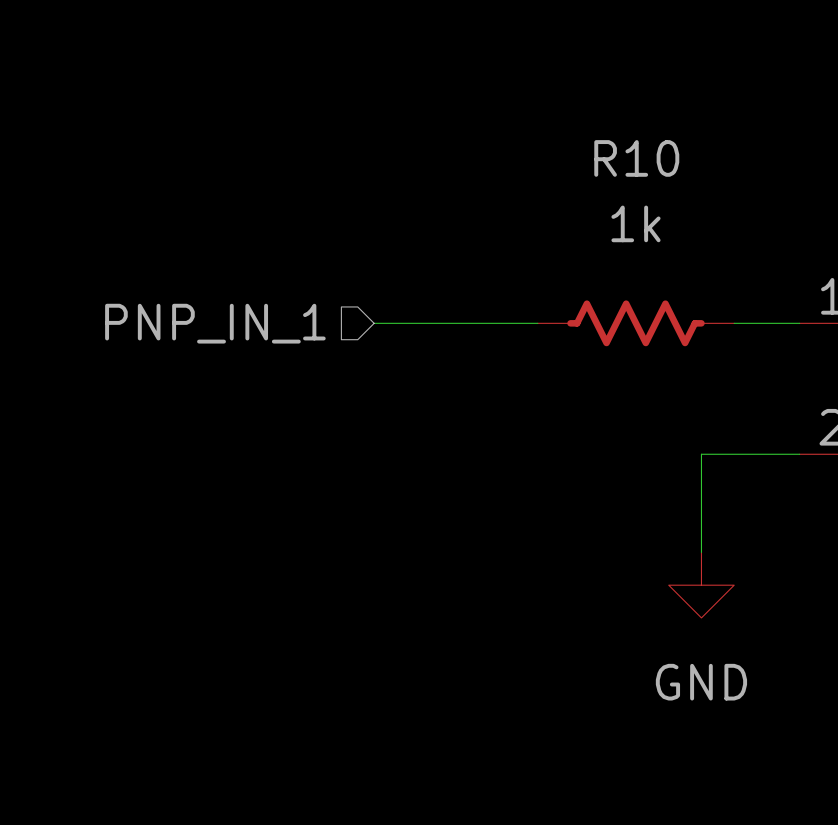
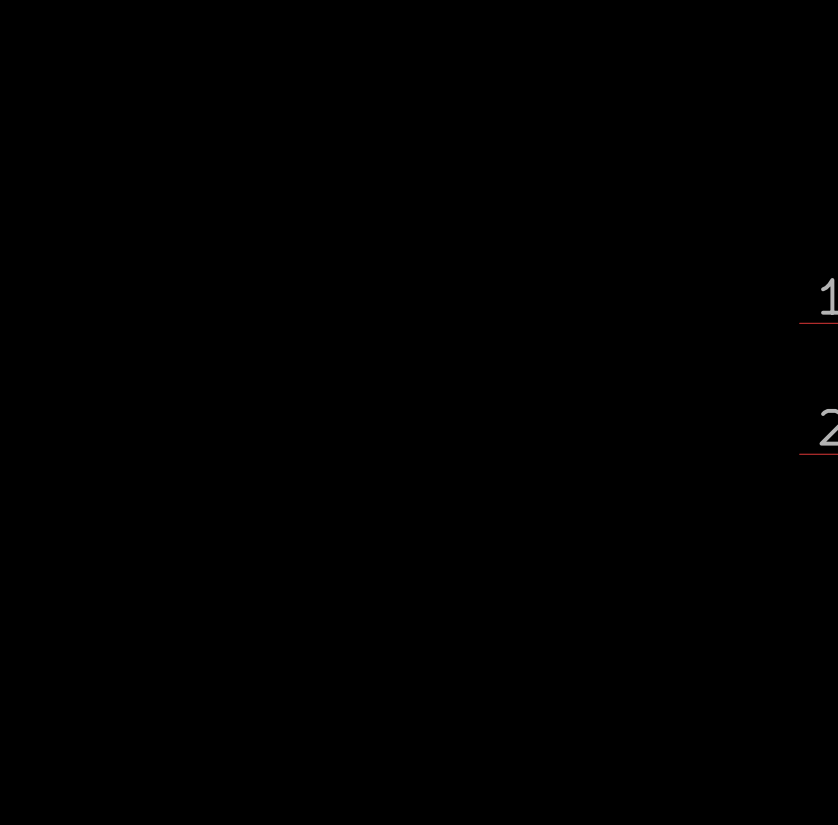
hierarchical label: PNP_IN_1 (215, 323) -> none
wire: (374, 323) (537, 323) -> none
R10: 1k (635, 323) -> none
wire: (734, 323) (799, 323) -> none
wire: (799, 454) (701, 454) (701, 552) -> none
power symbol: GND (701, 585) -> none

